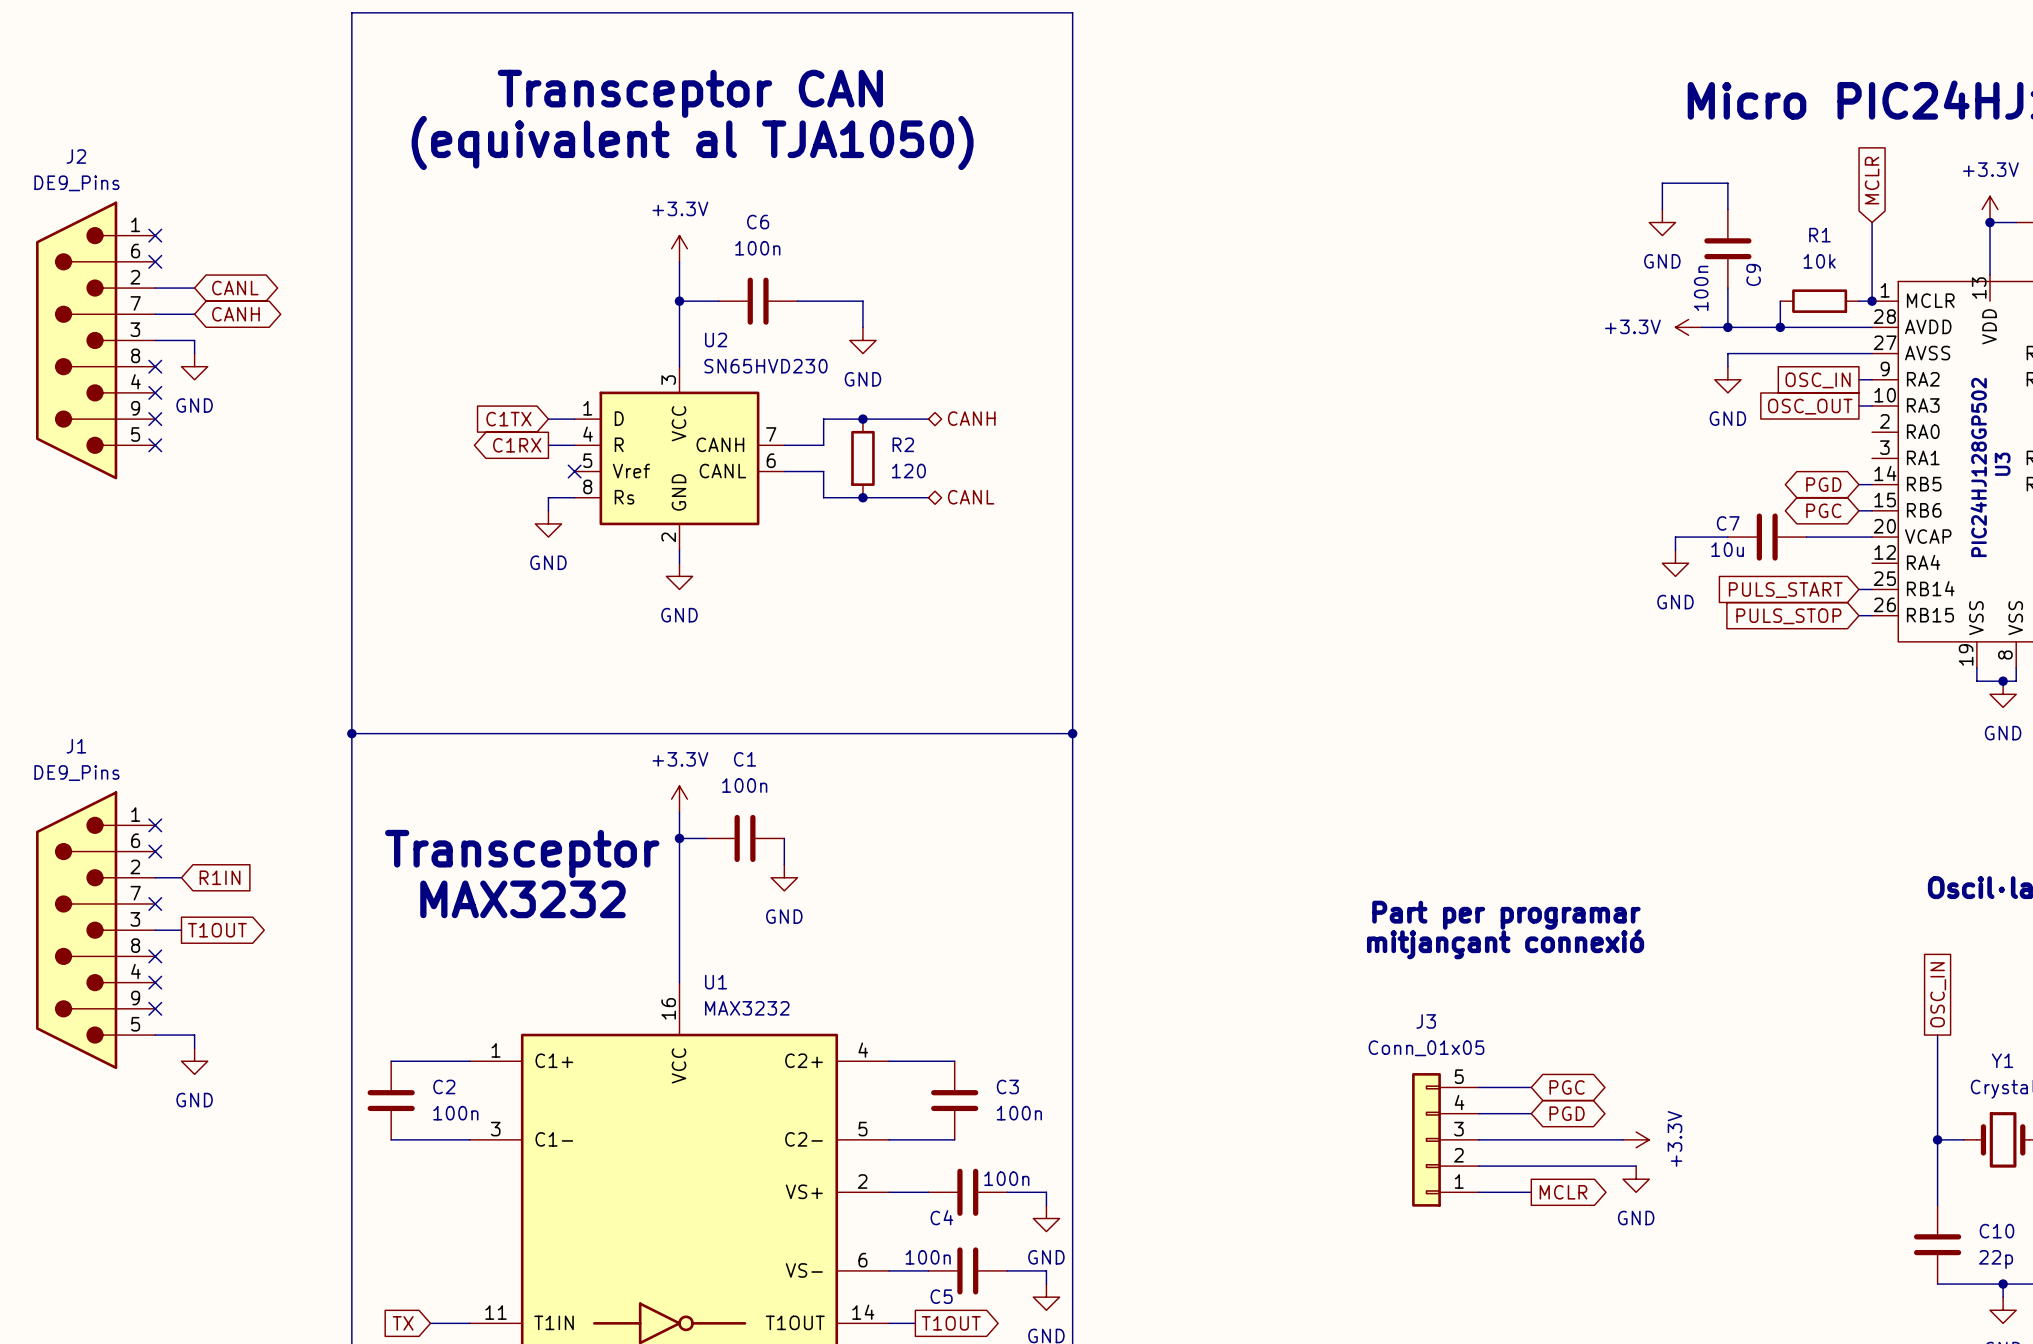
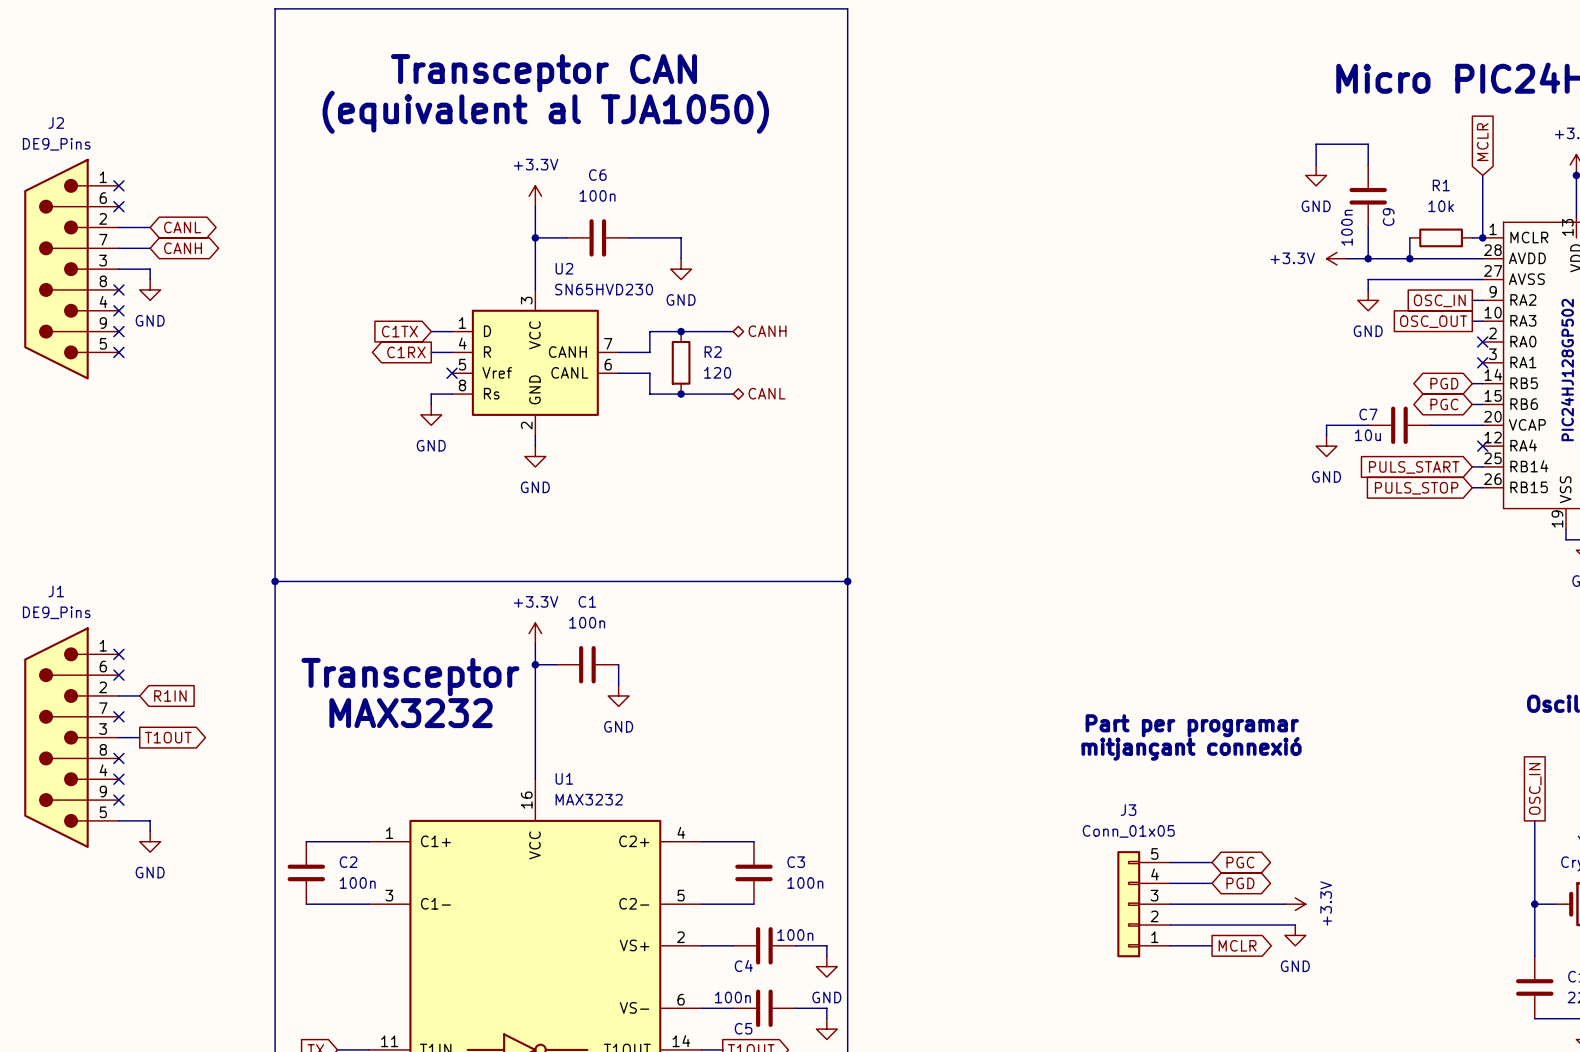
no-connect mark: none -> (1482, 342)
no-connect mark: none -> (1482, 362)
no-connect mark: none -> (1482, 446)

